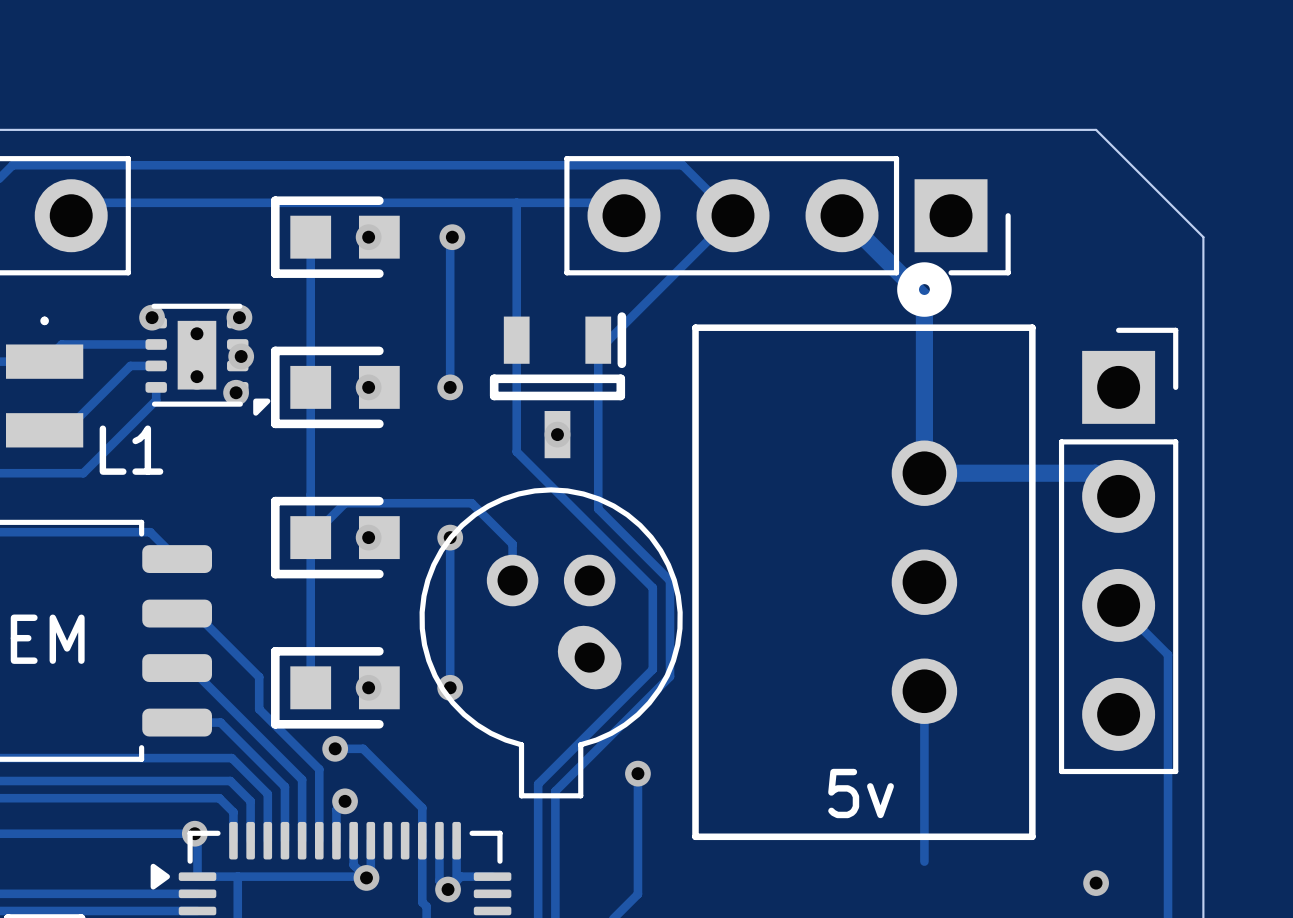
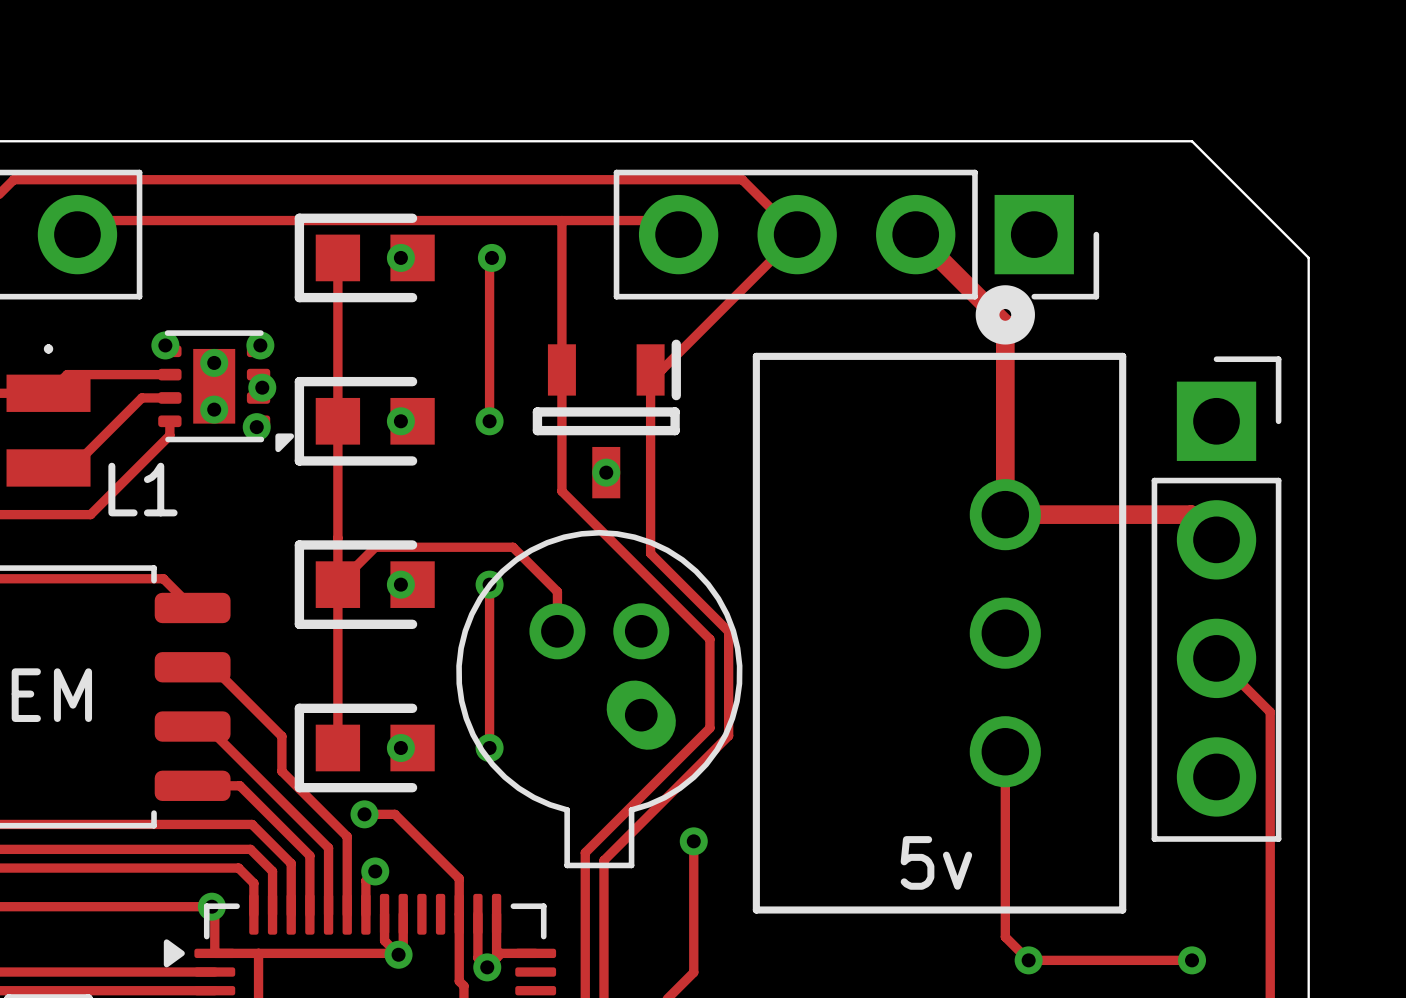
track: none -> (1005, 937) (1028, 960) (1192, 960)
via: none -> (1028, 960)

